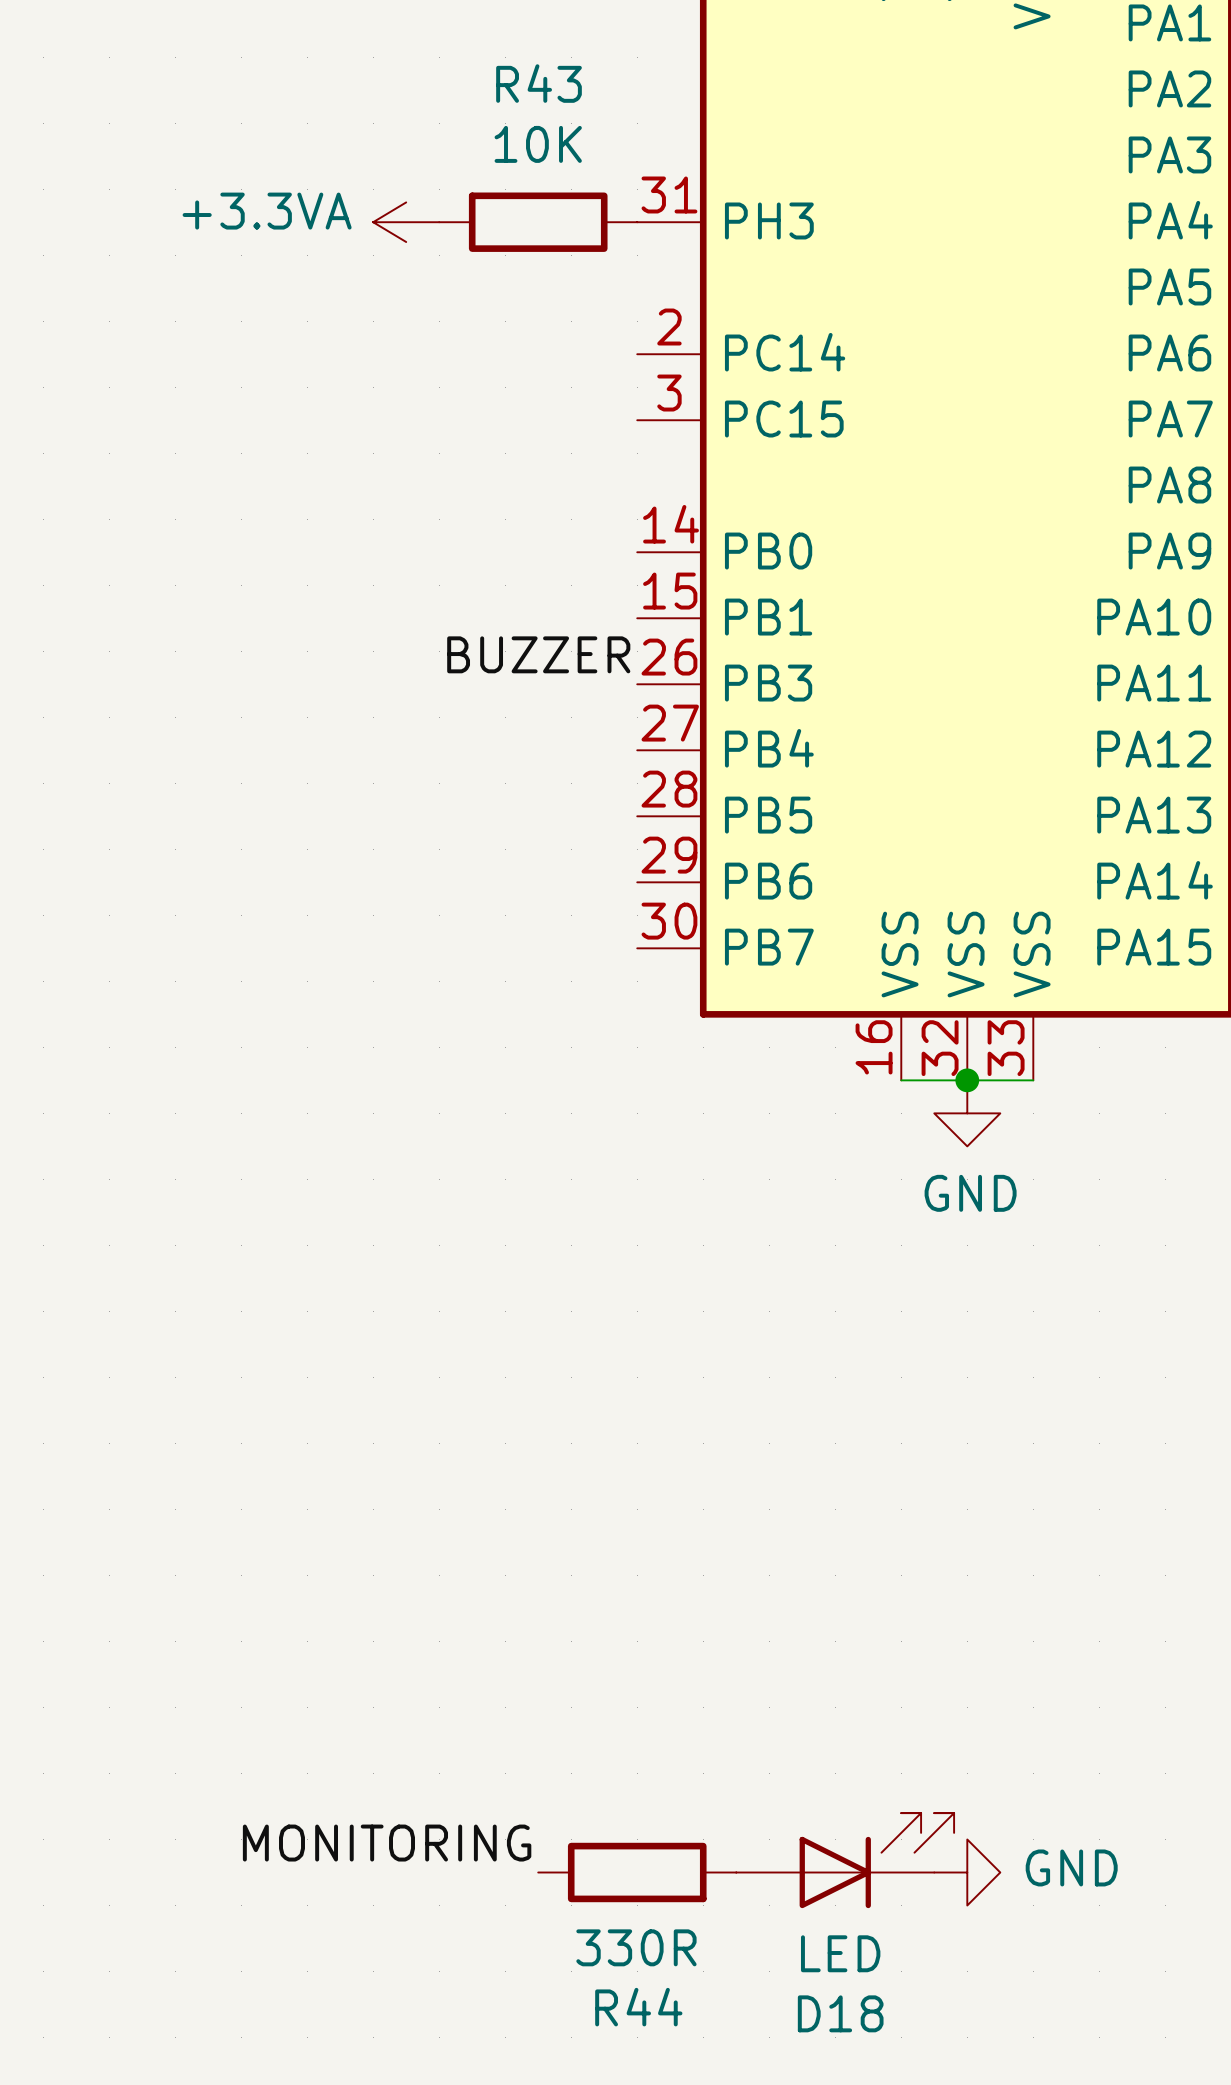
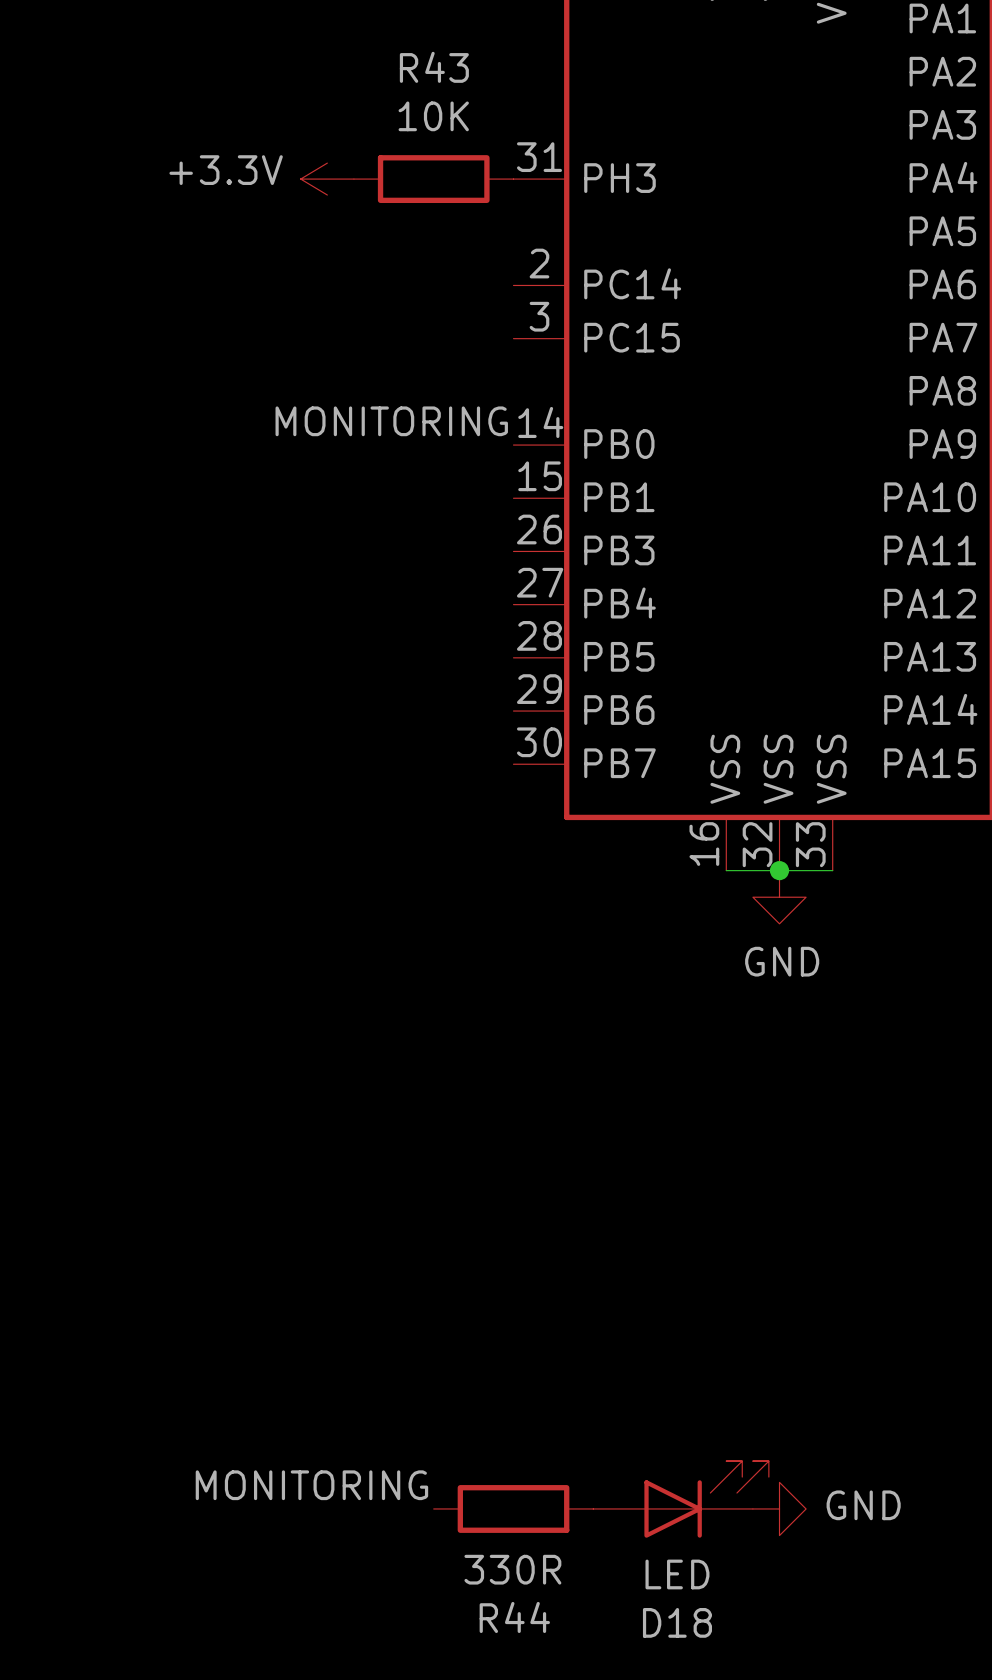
power symbol: +3.3VA (406, 222) -> +3.3V (327, 179)
label: none -> MONITORING (391, 421)
label: BUZZER (538, 654) -> none

